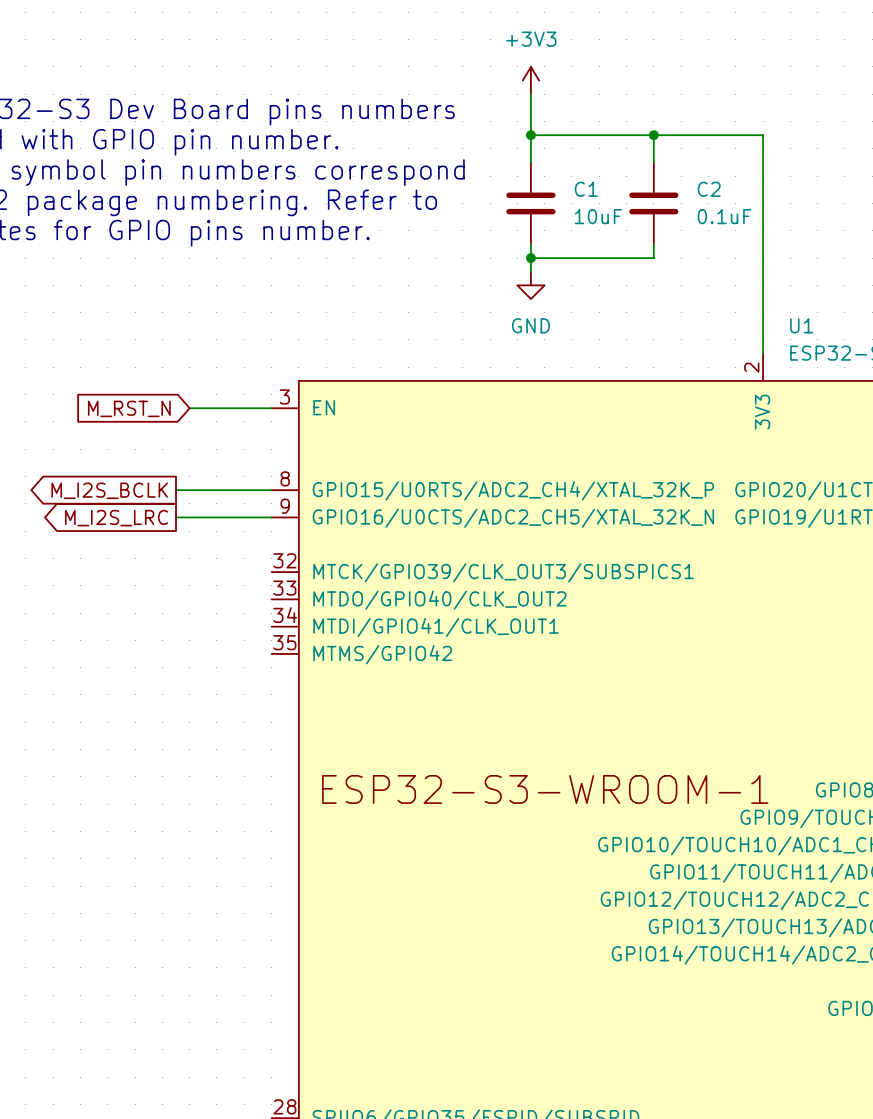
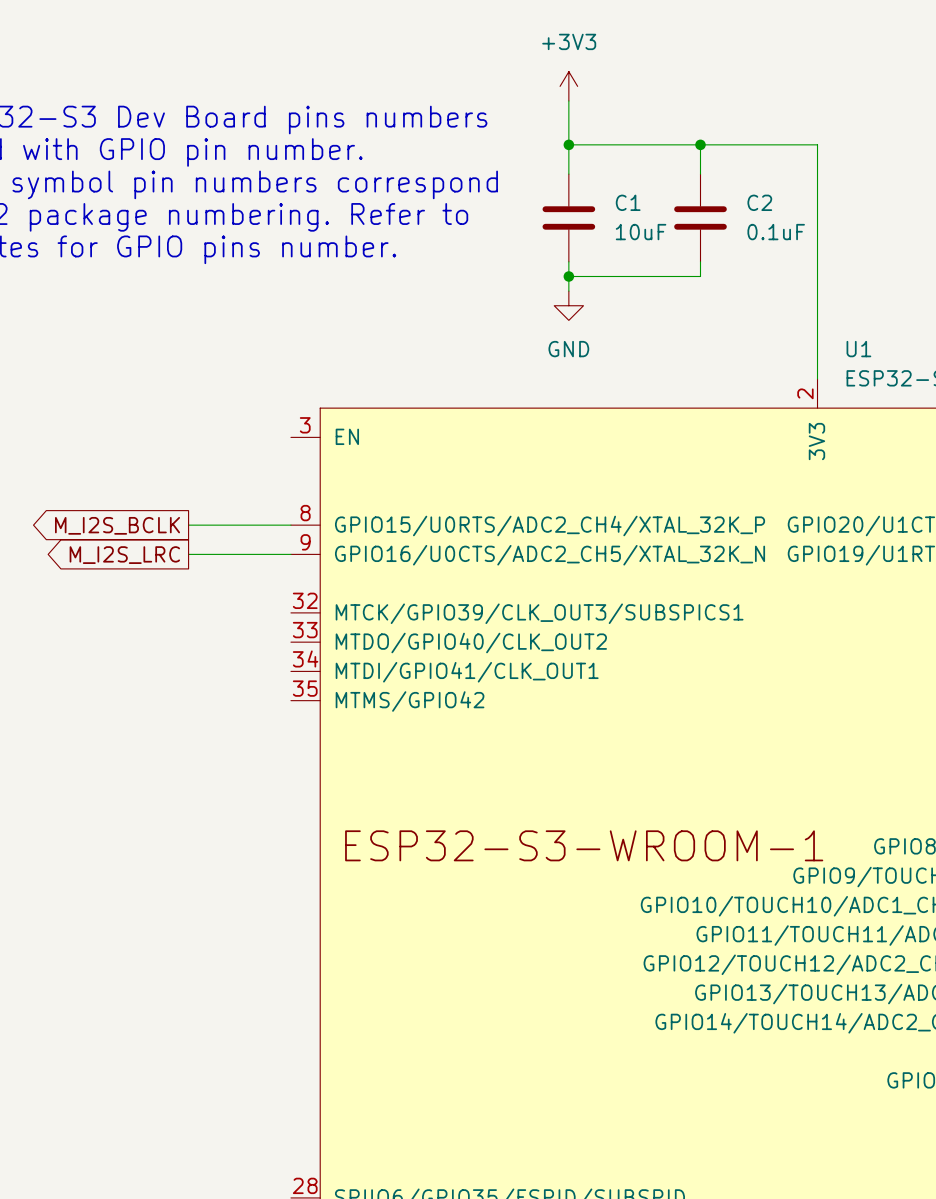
global label: M_RST_N (129, 408) -> none
wire: (189, 408) (271, 408) -> none

